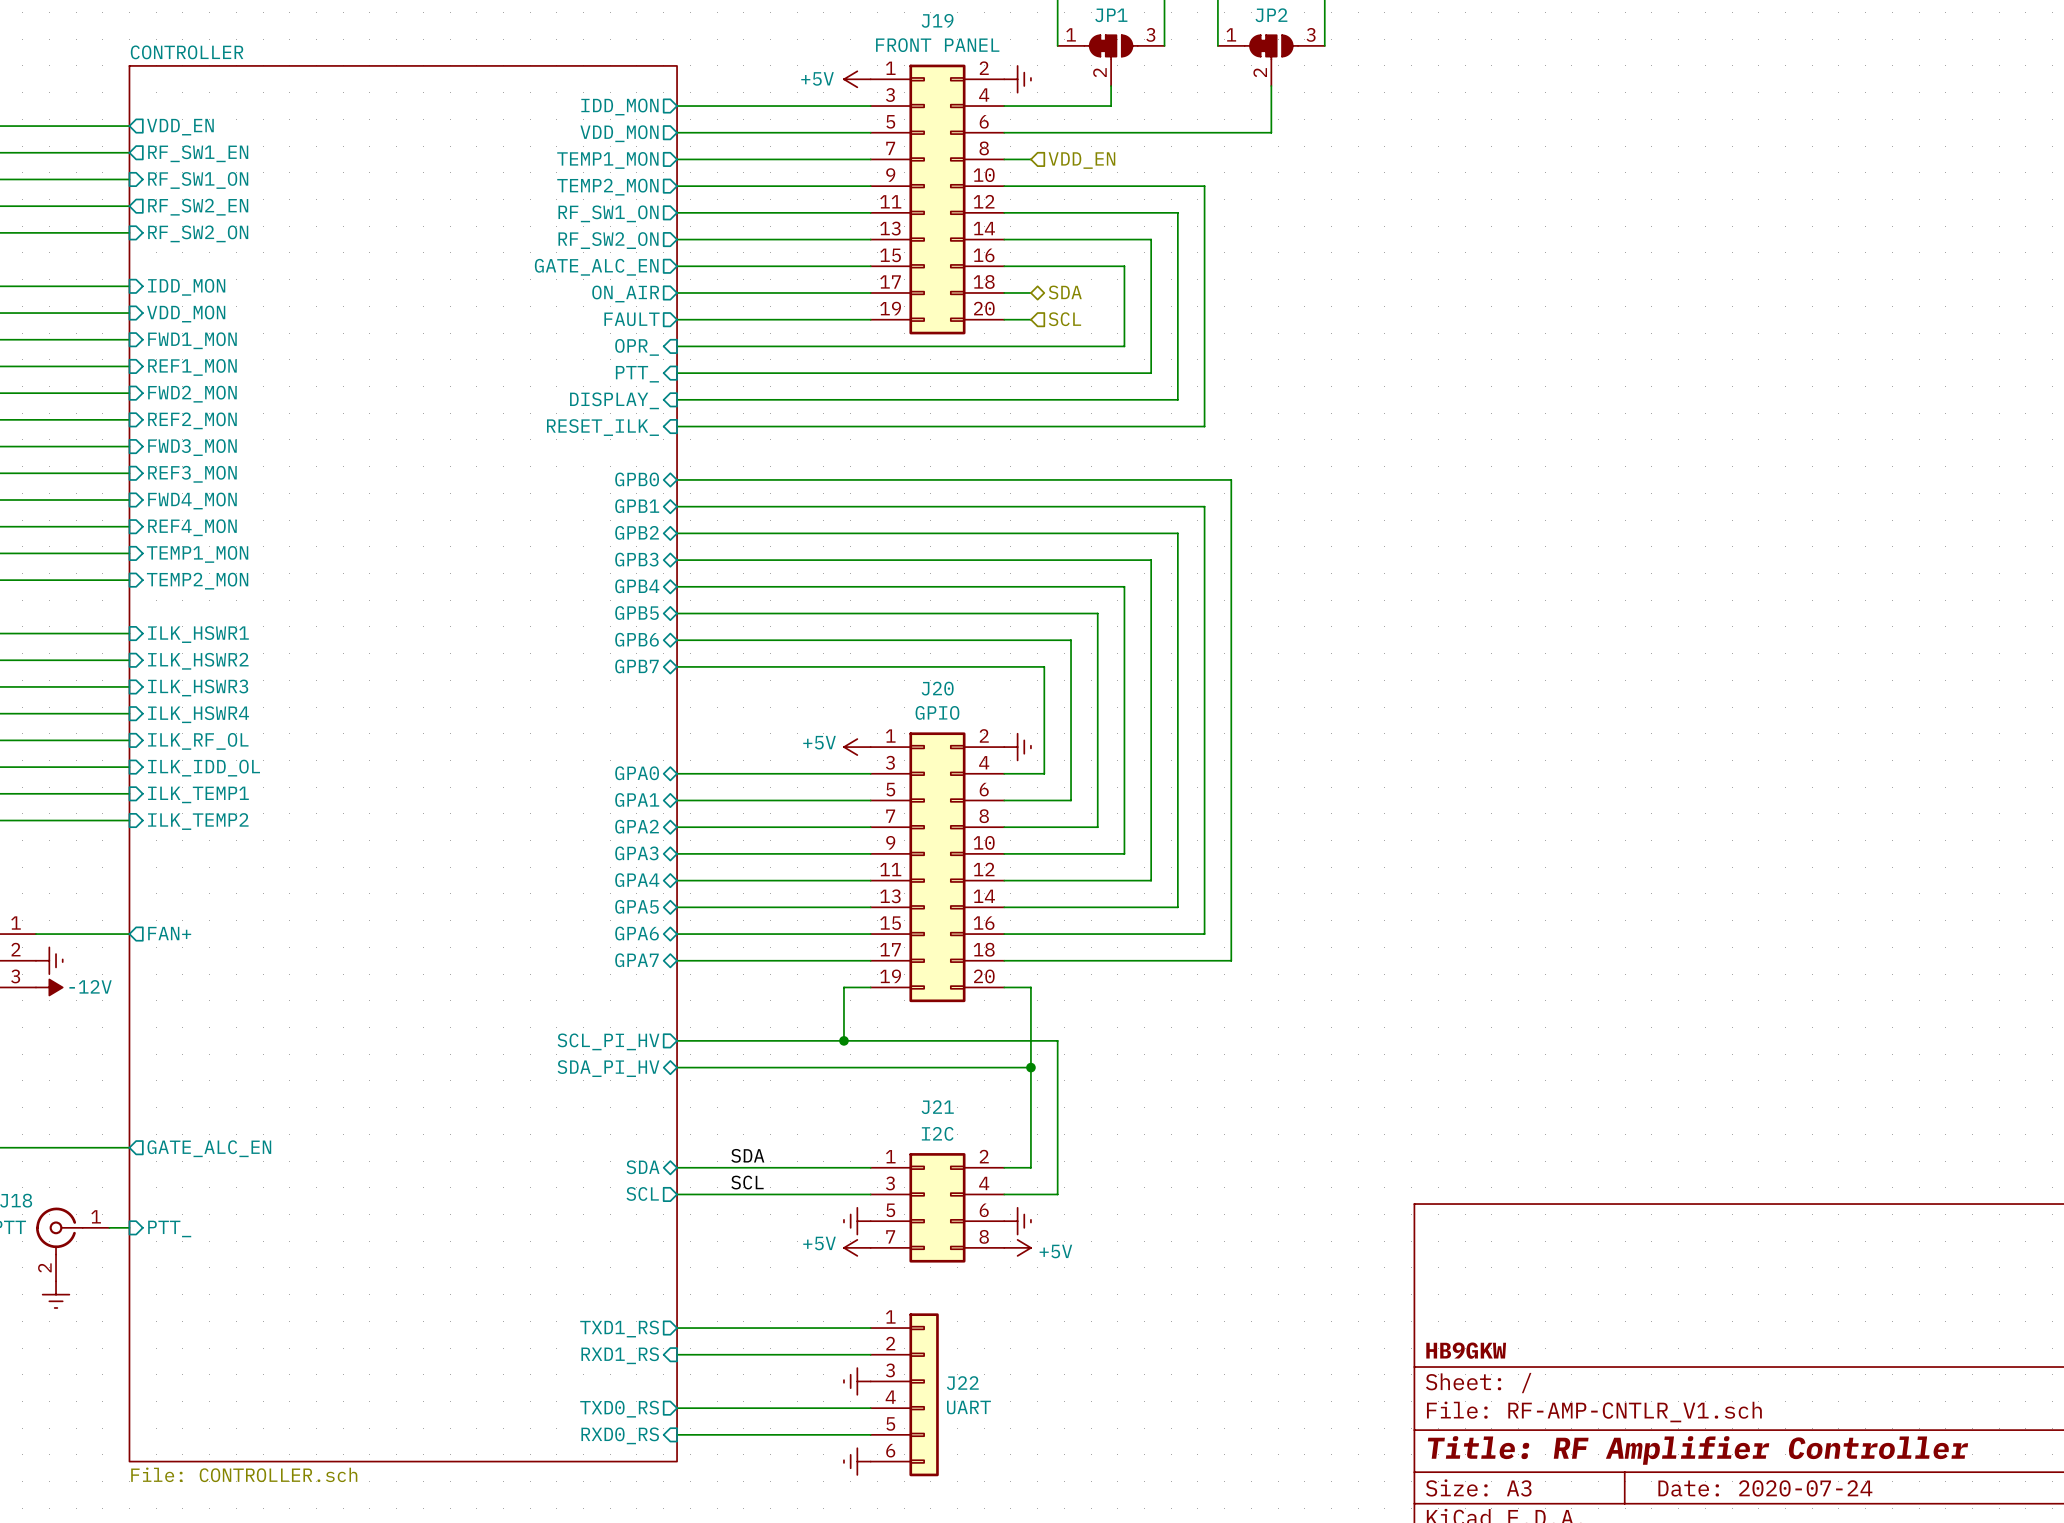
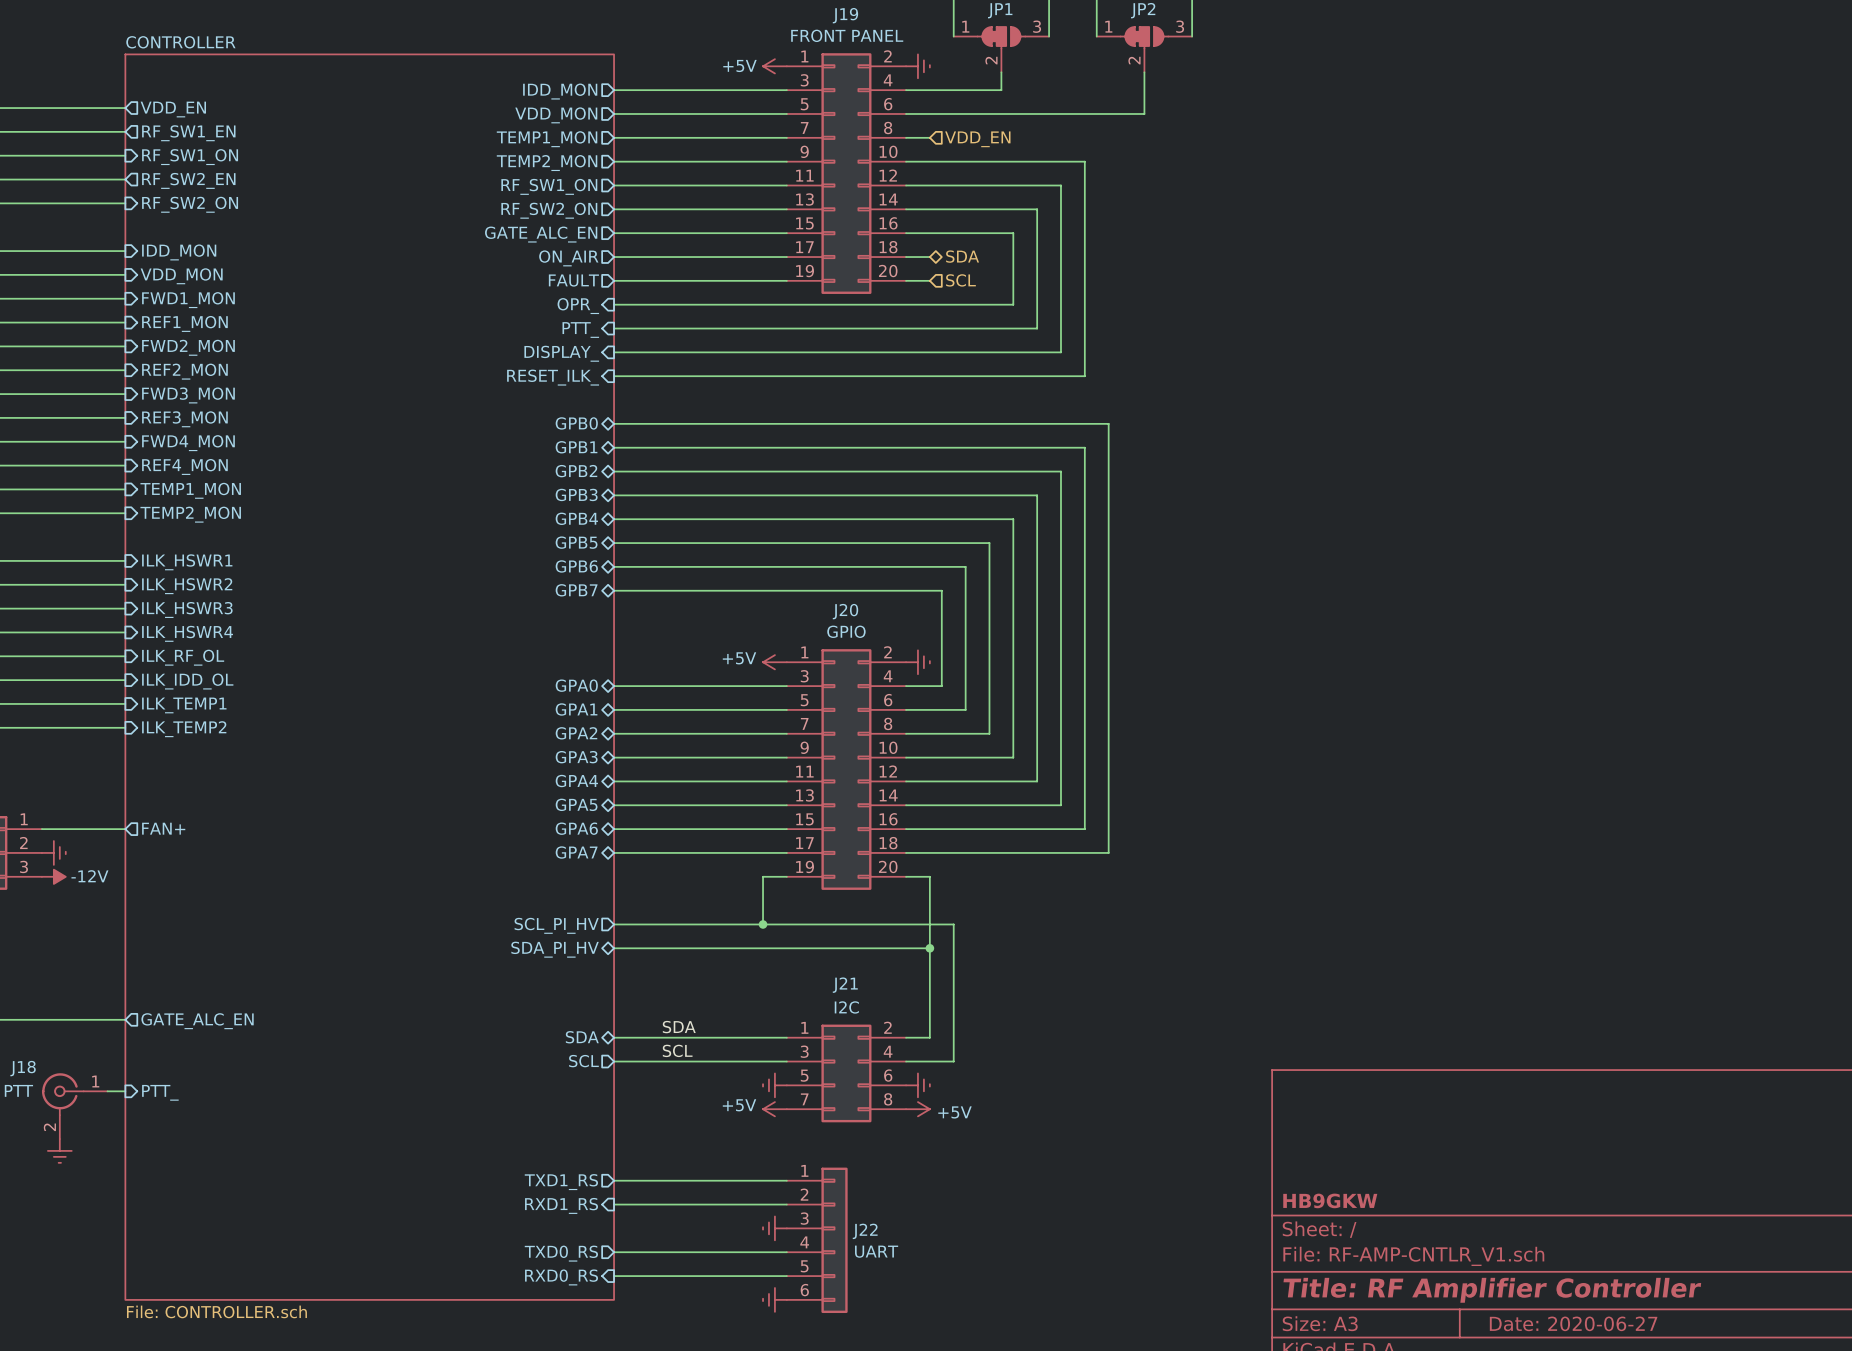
title block: Date: 2020-07-24 (1765, 1488) -> Date: 2020-06-27 (1573, 1323)

